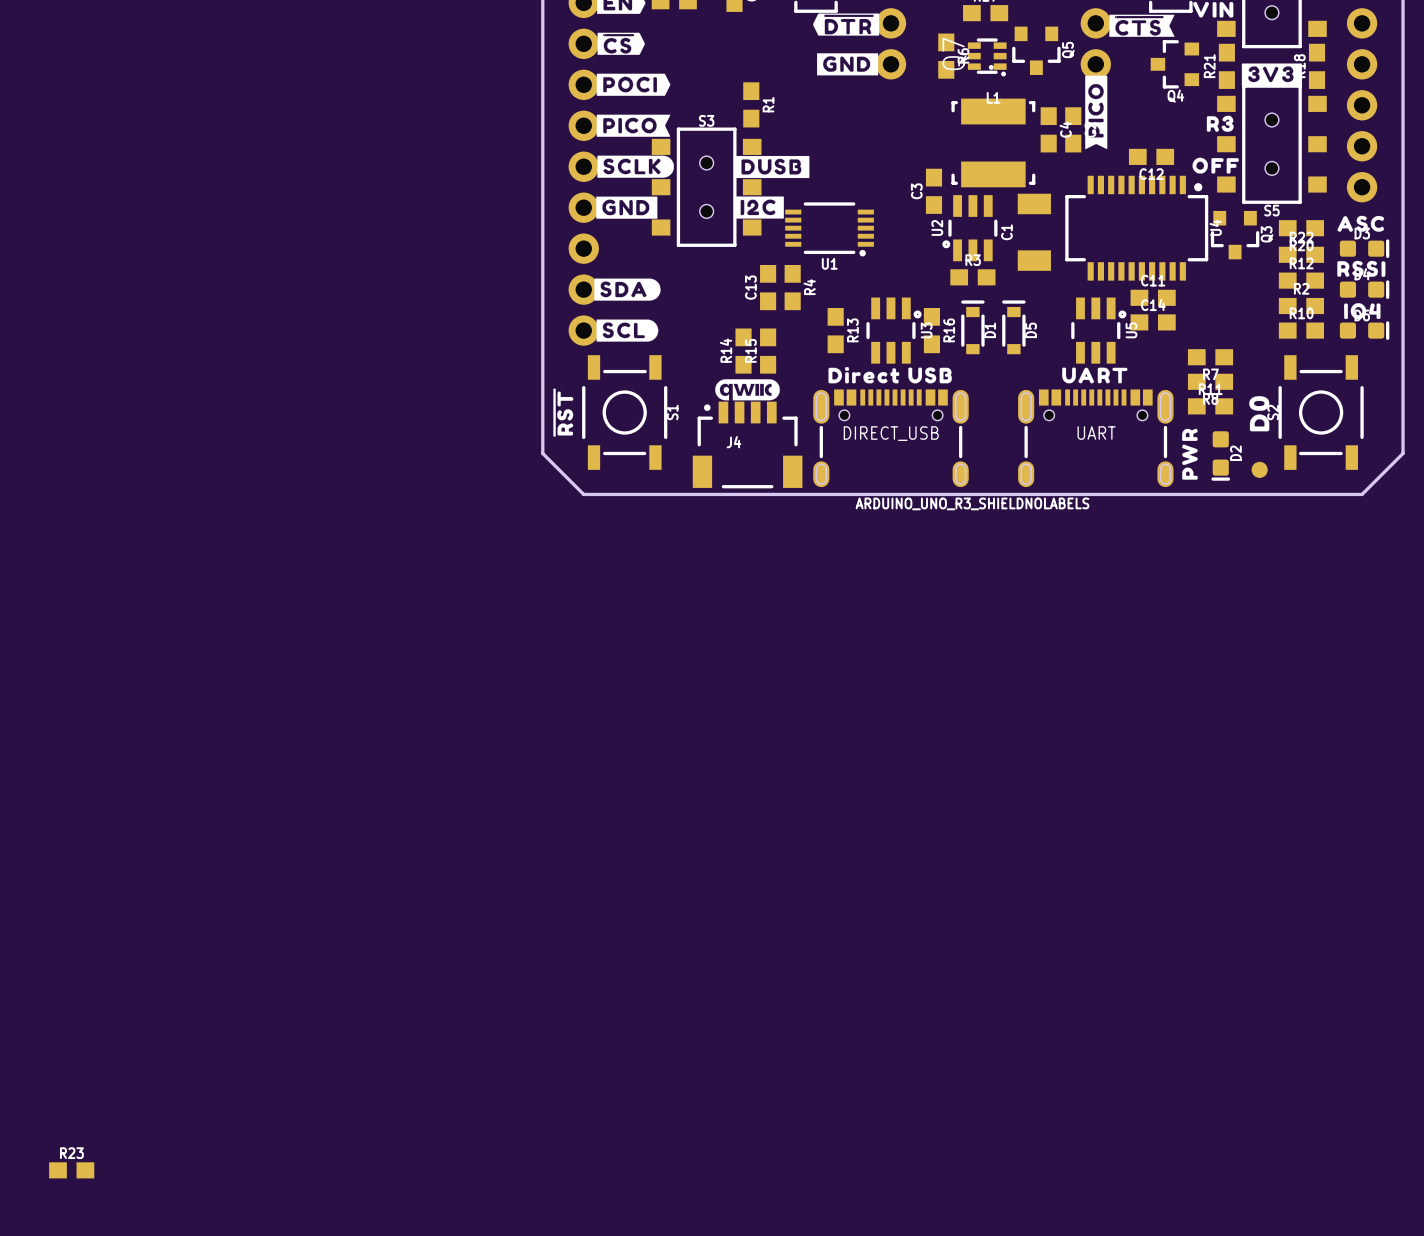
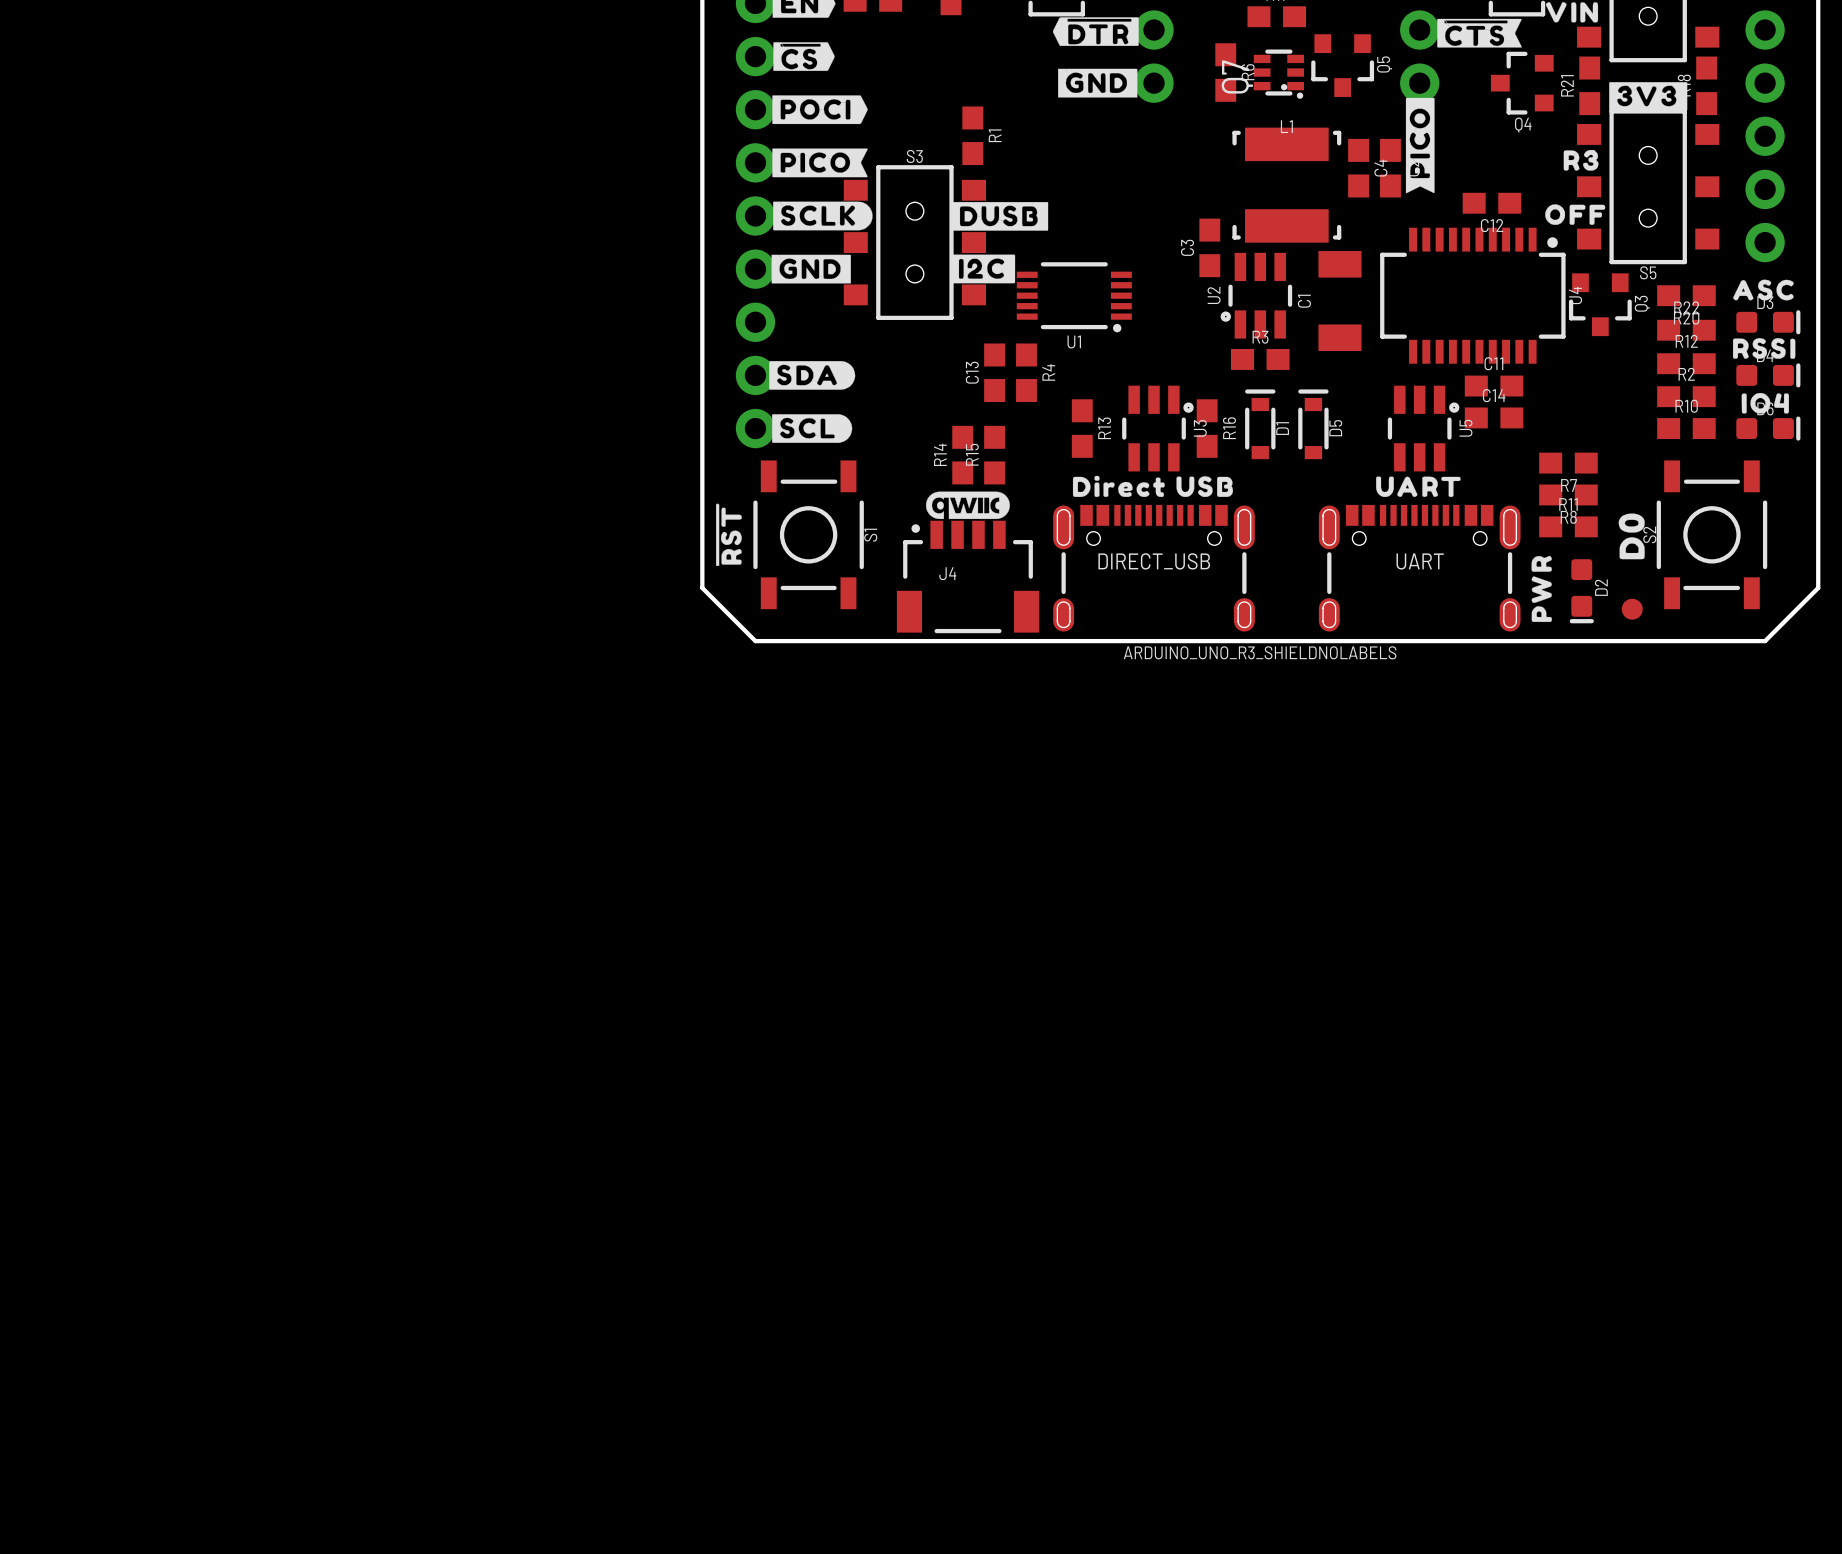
R23: (71, 1170) -> none

